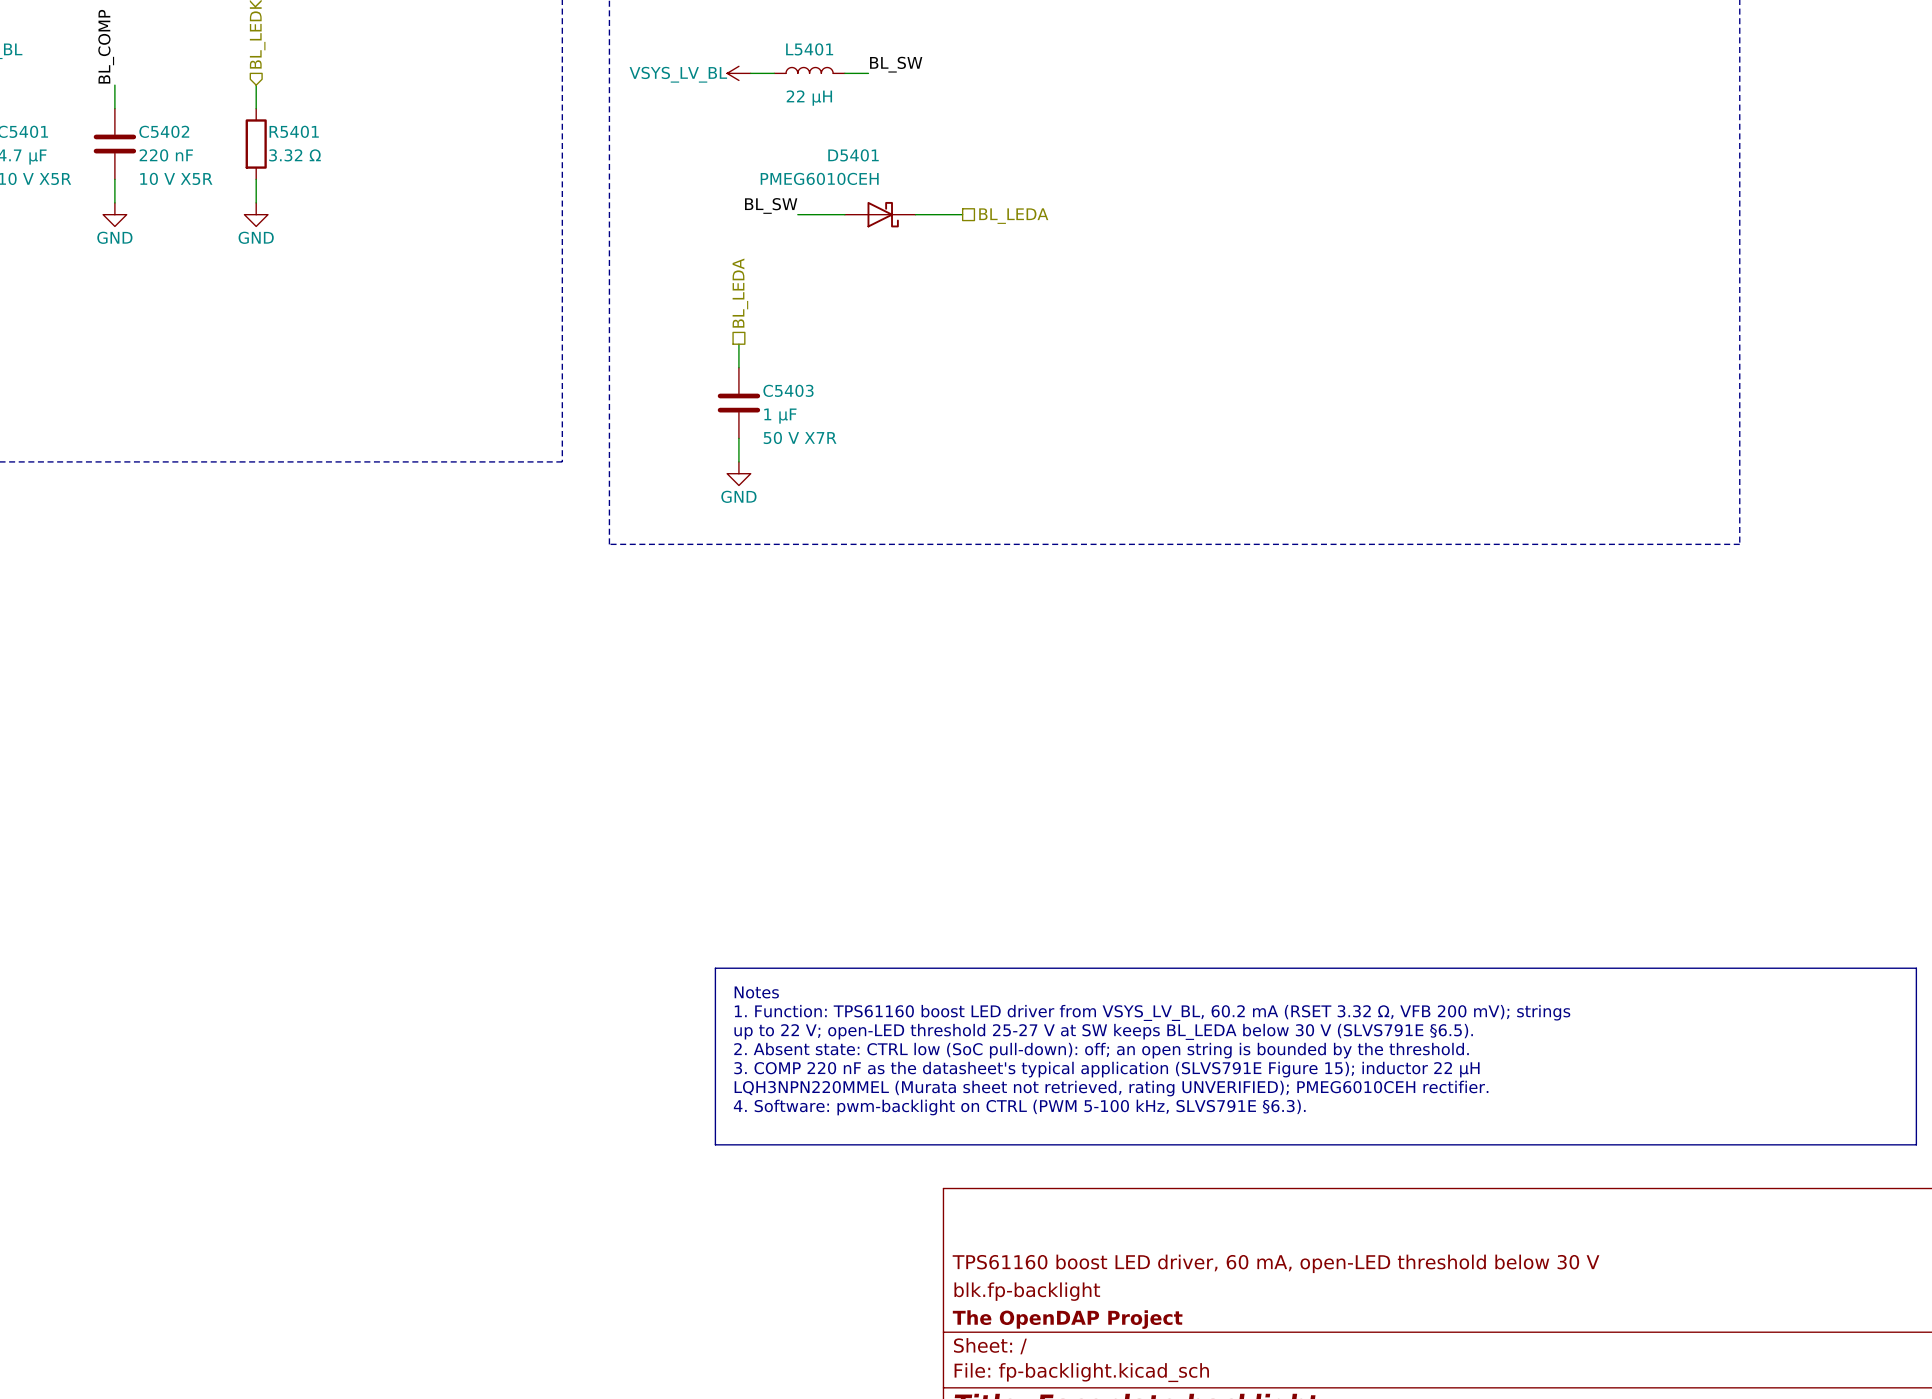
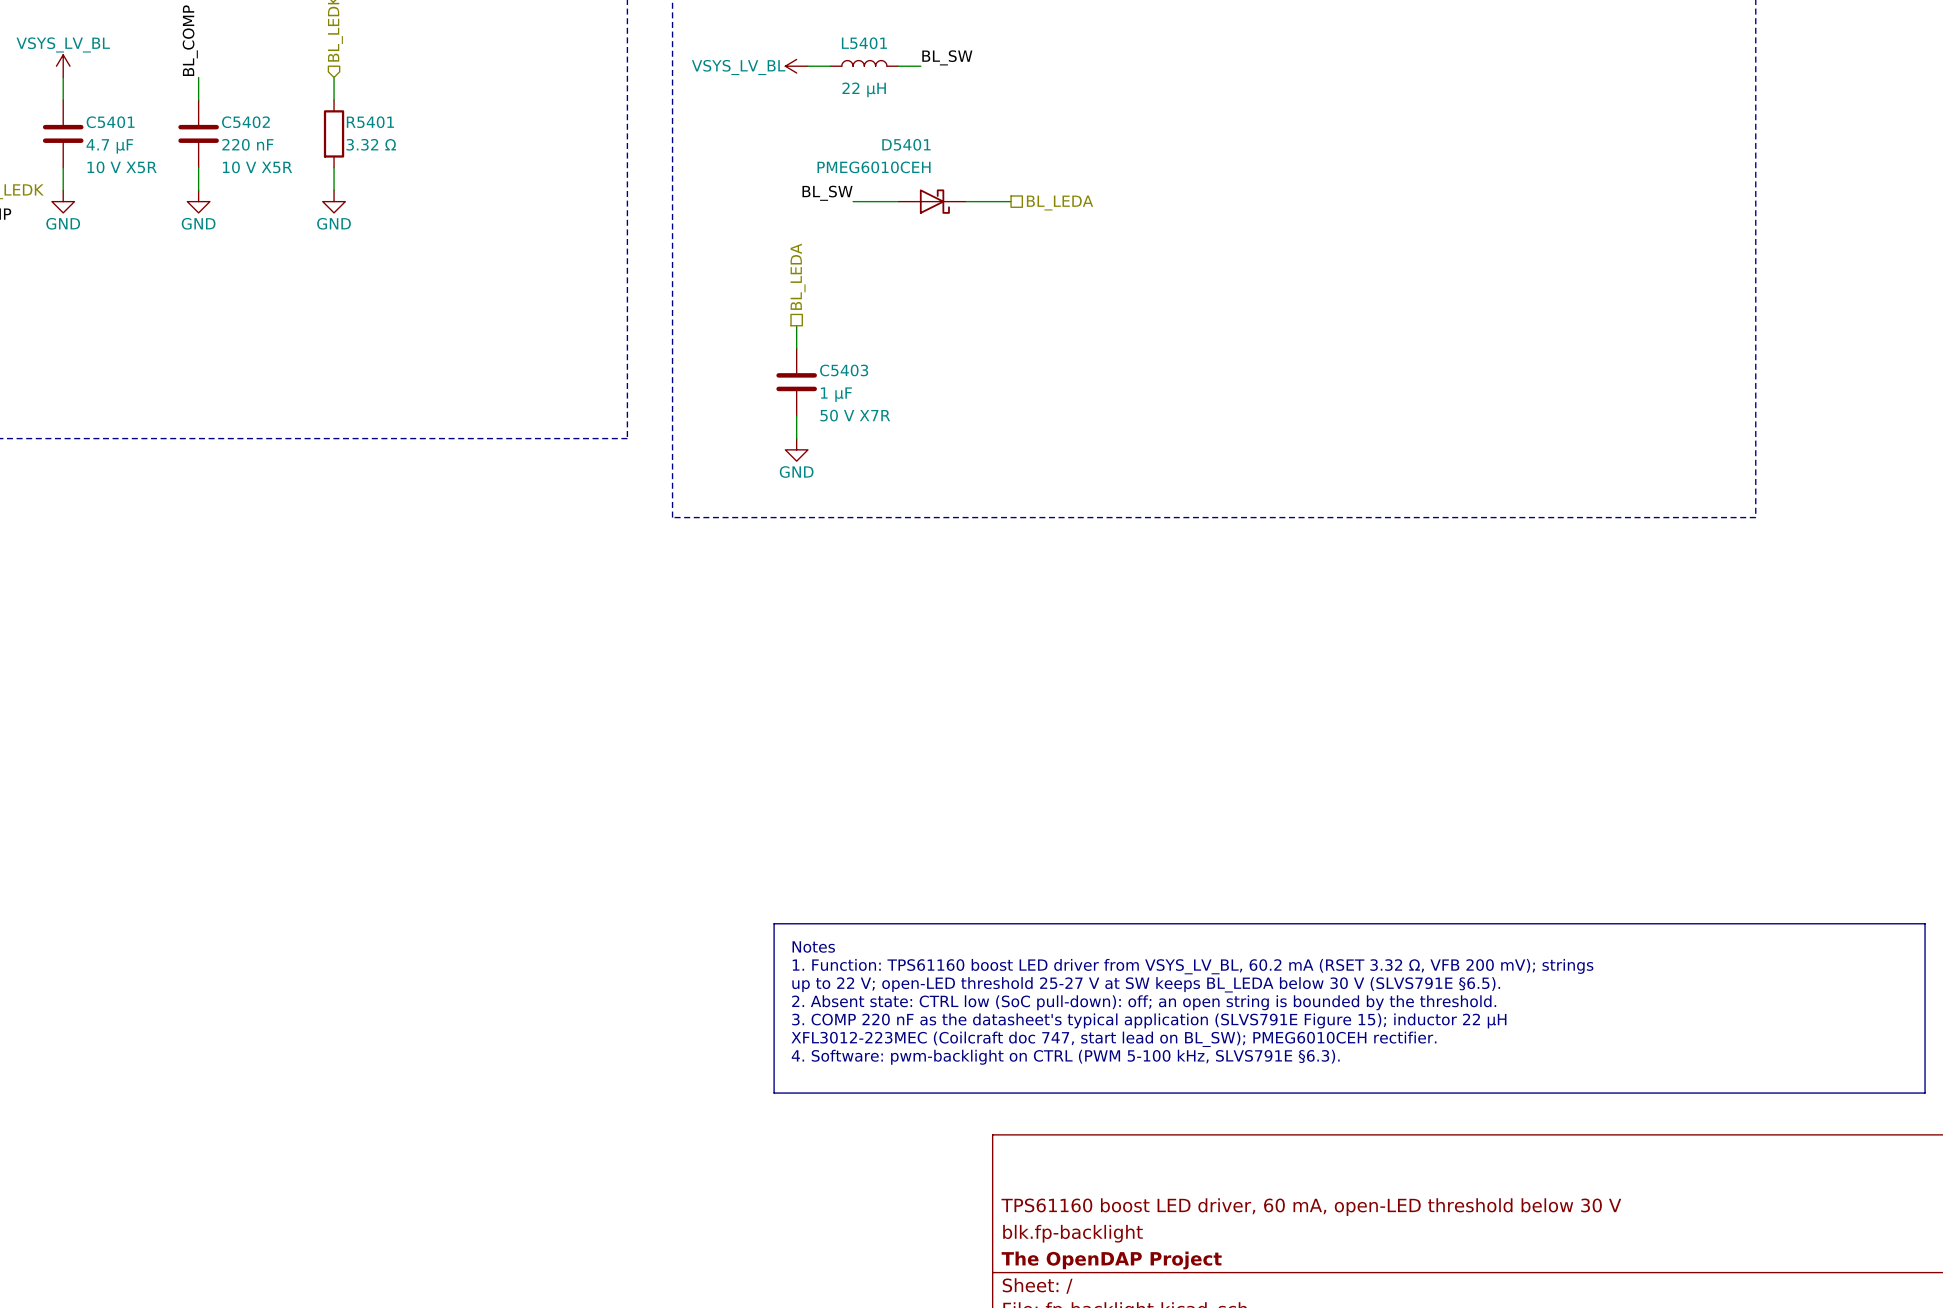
text: LQH3NPN220MMEL (Murata sheet not retrieved, rating UNVERIFIED); PMEG6010CEH rectifier. (1111, 1088) -> XFL3012-223MEC (Coilcraft doc 747, start lead on BL_SW); PMEG6010CEH rectifier. (1113, 1039)

